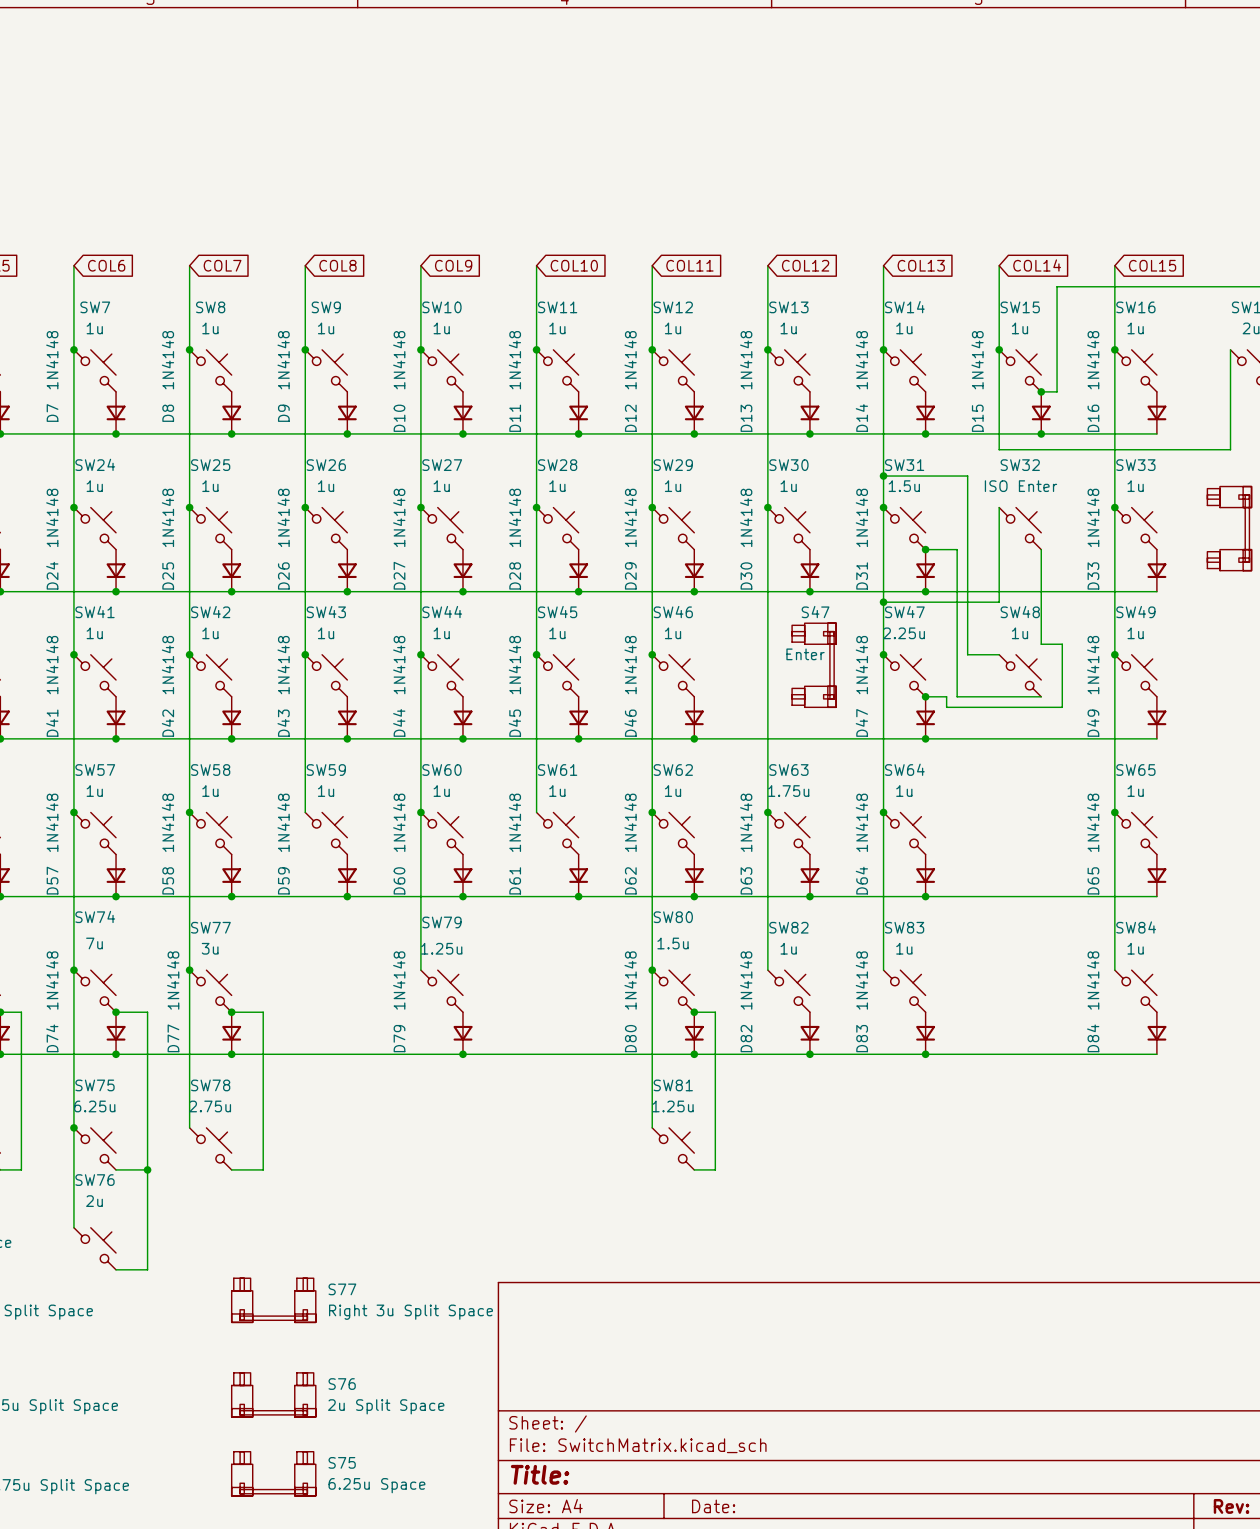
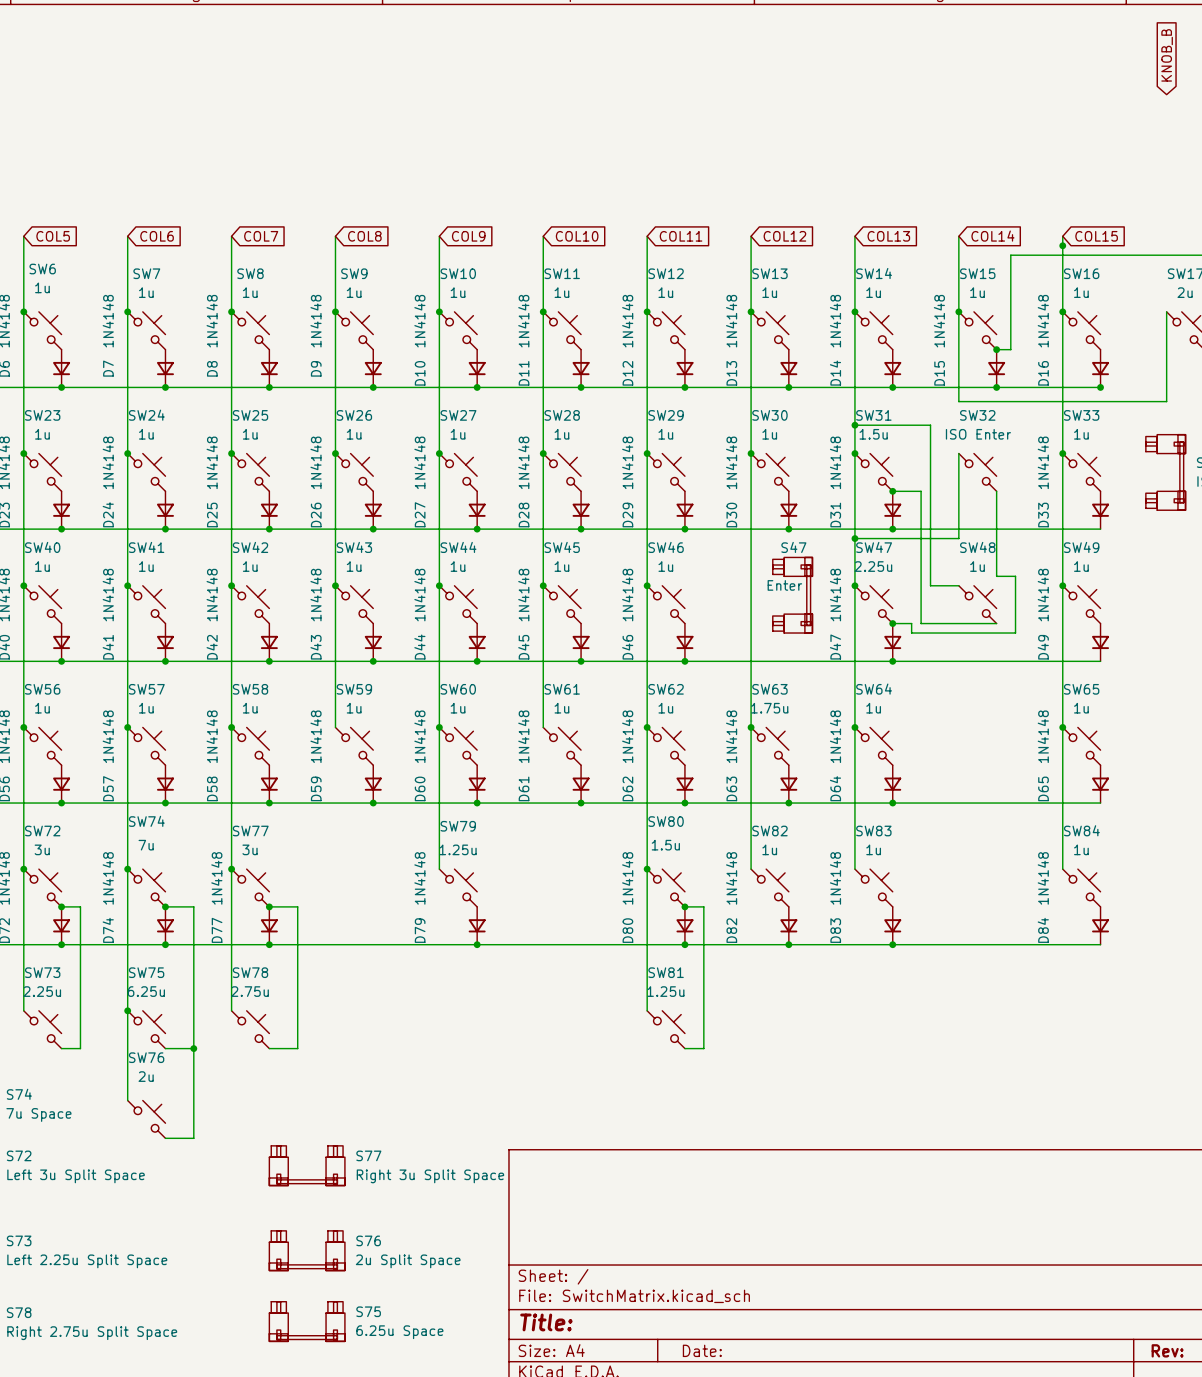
global label: none -> KNOB_B (1167, 55)
junction: none -> (1062, 245)
junction: none -> (1100, 387)

